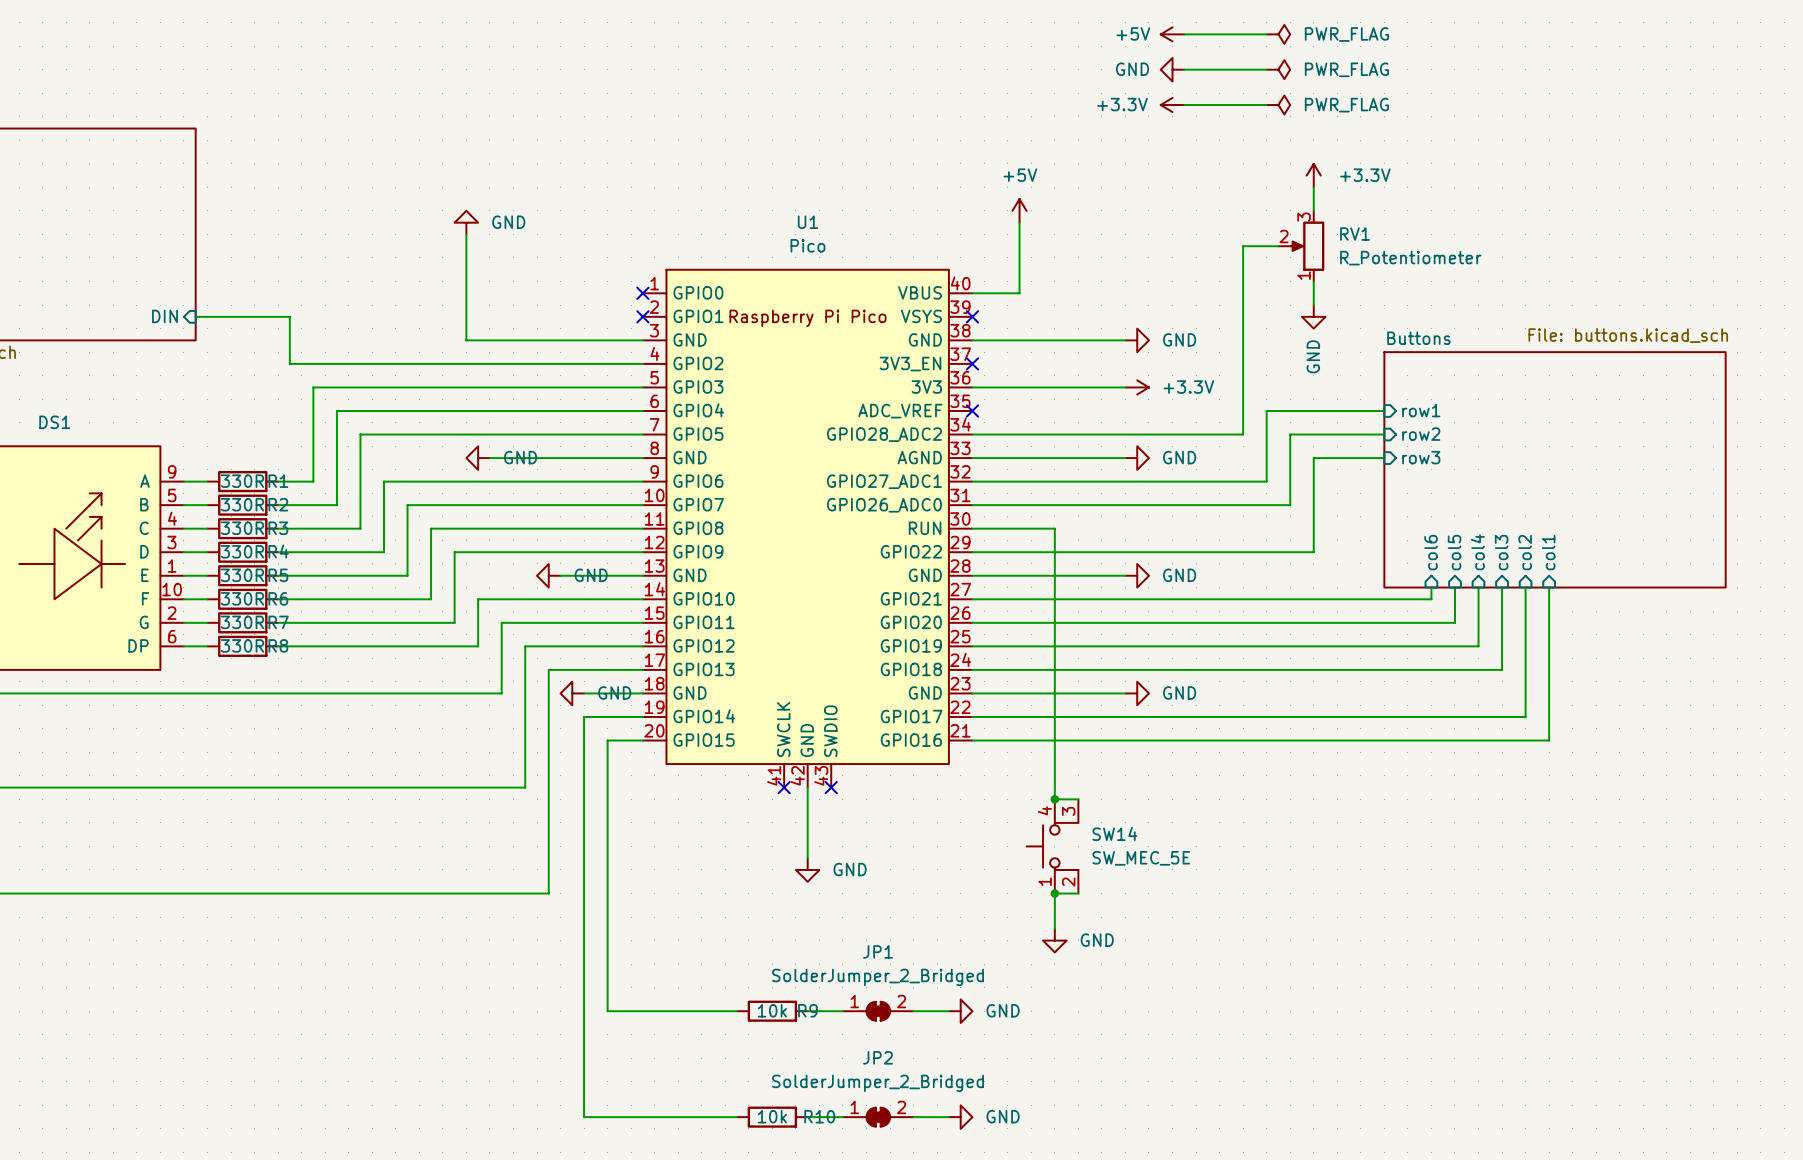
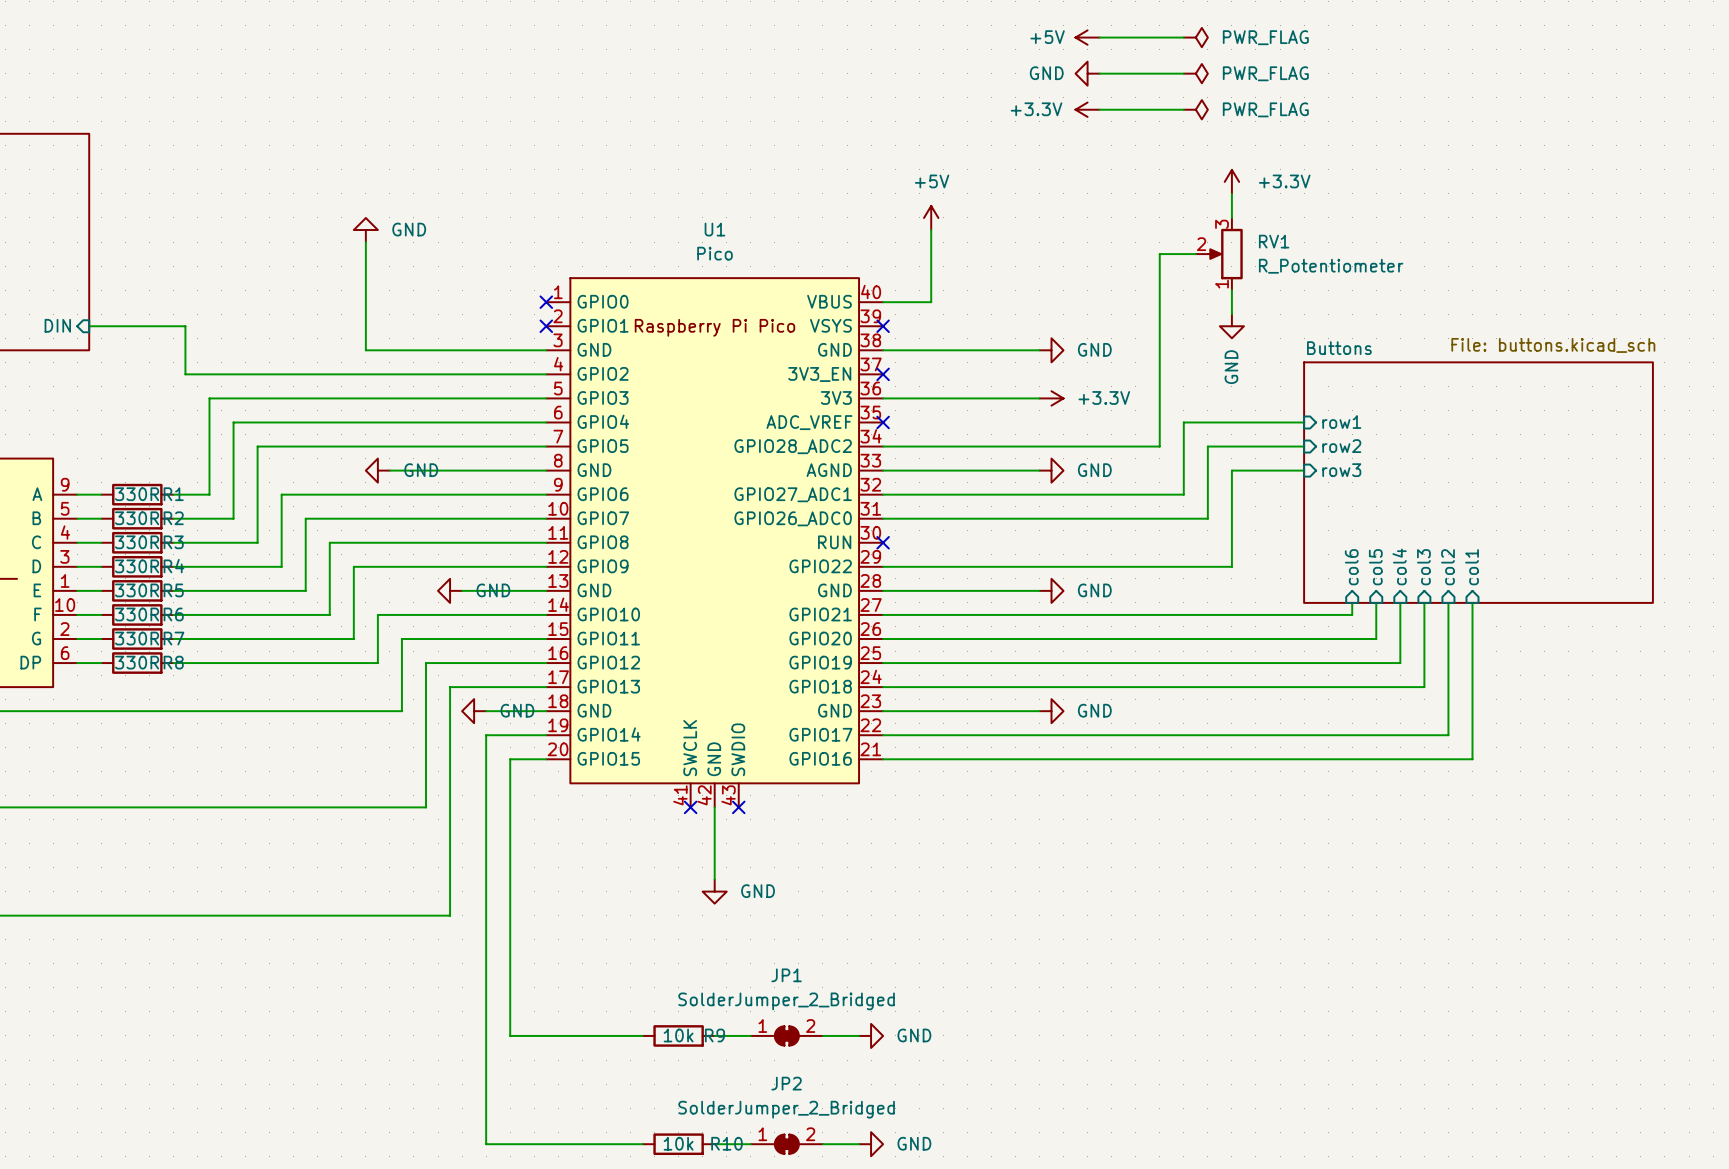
wire: (972, 528) (1054, 528) (1054, 799) (1078, 799) -> none
no-connect mark: none -> (883, 542)
junction: (1054, 799) -> none
SW14: SW_MEC_5E (1052, 846) -> none
junction: (1054, 893) -> none
wire: (1078, 893) (1054, 893) (1054, 928) -> none
power symbol: GND (1054, 940) -> none

